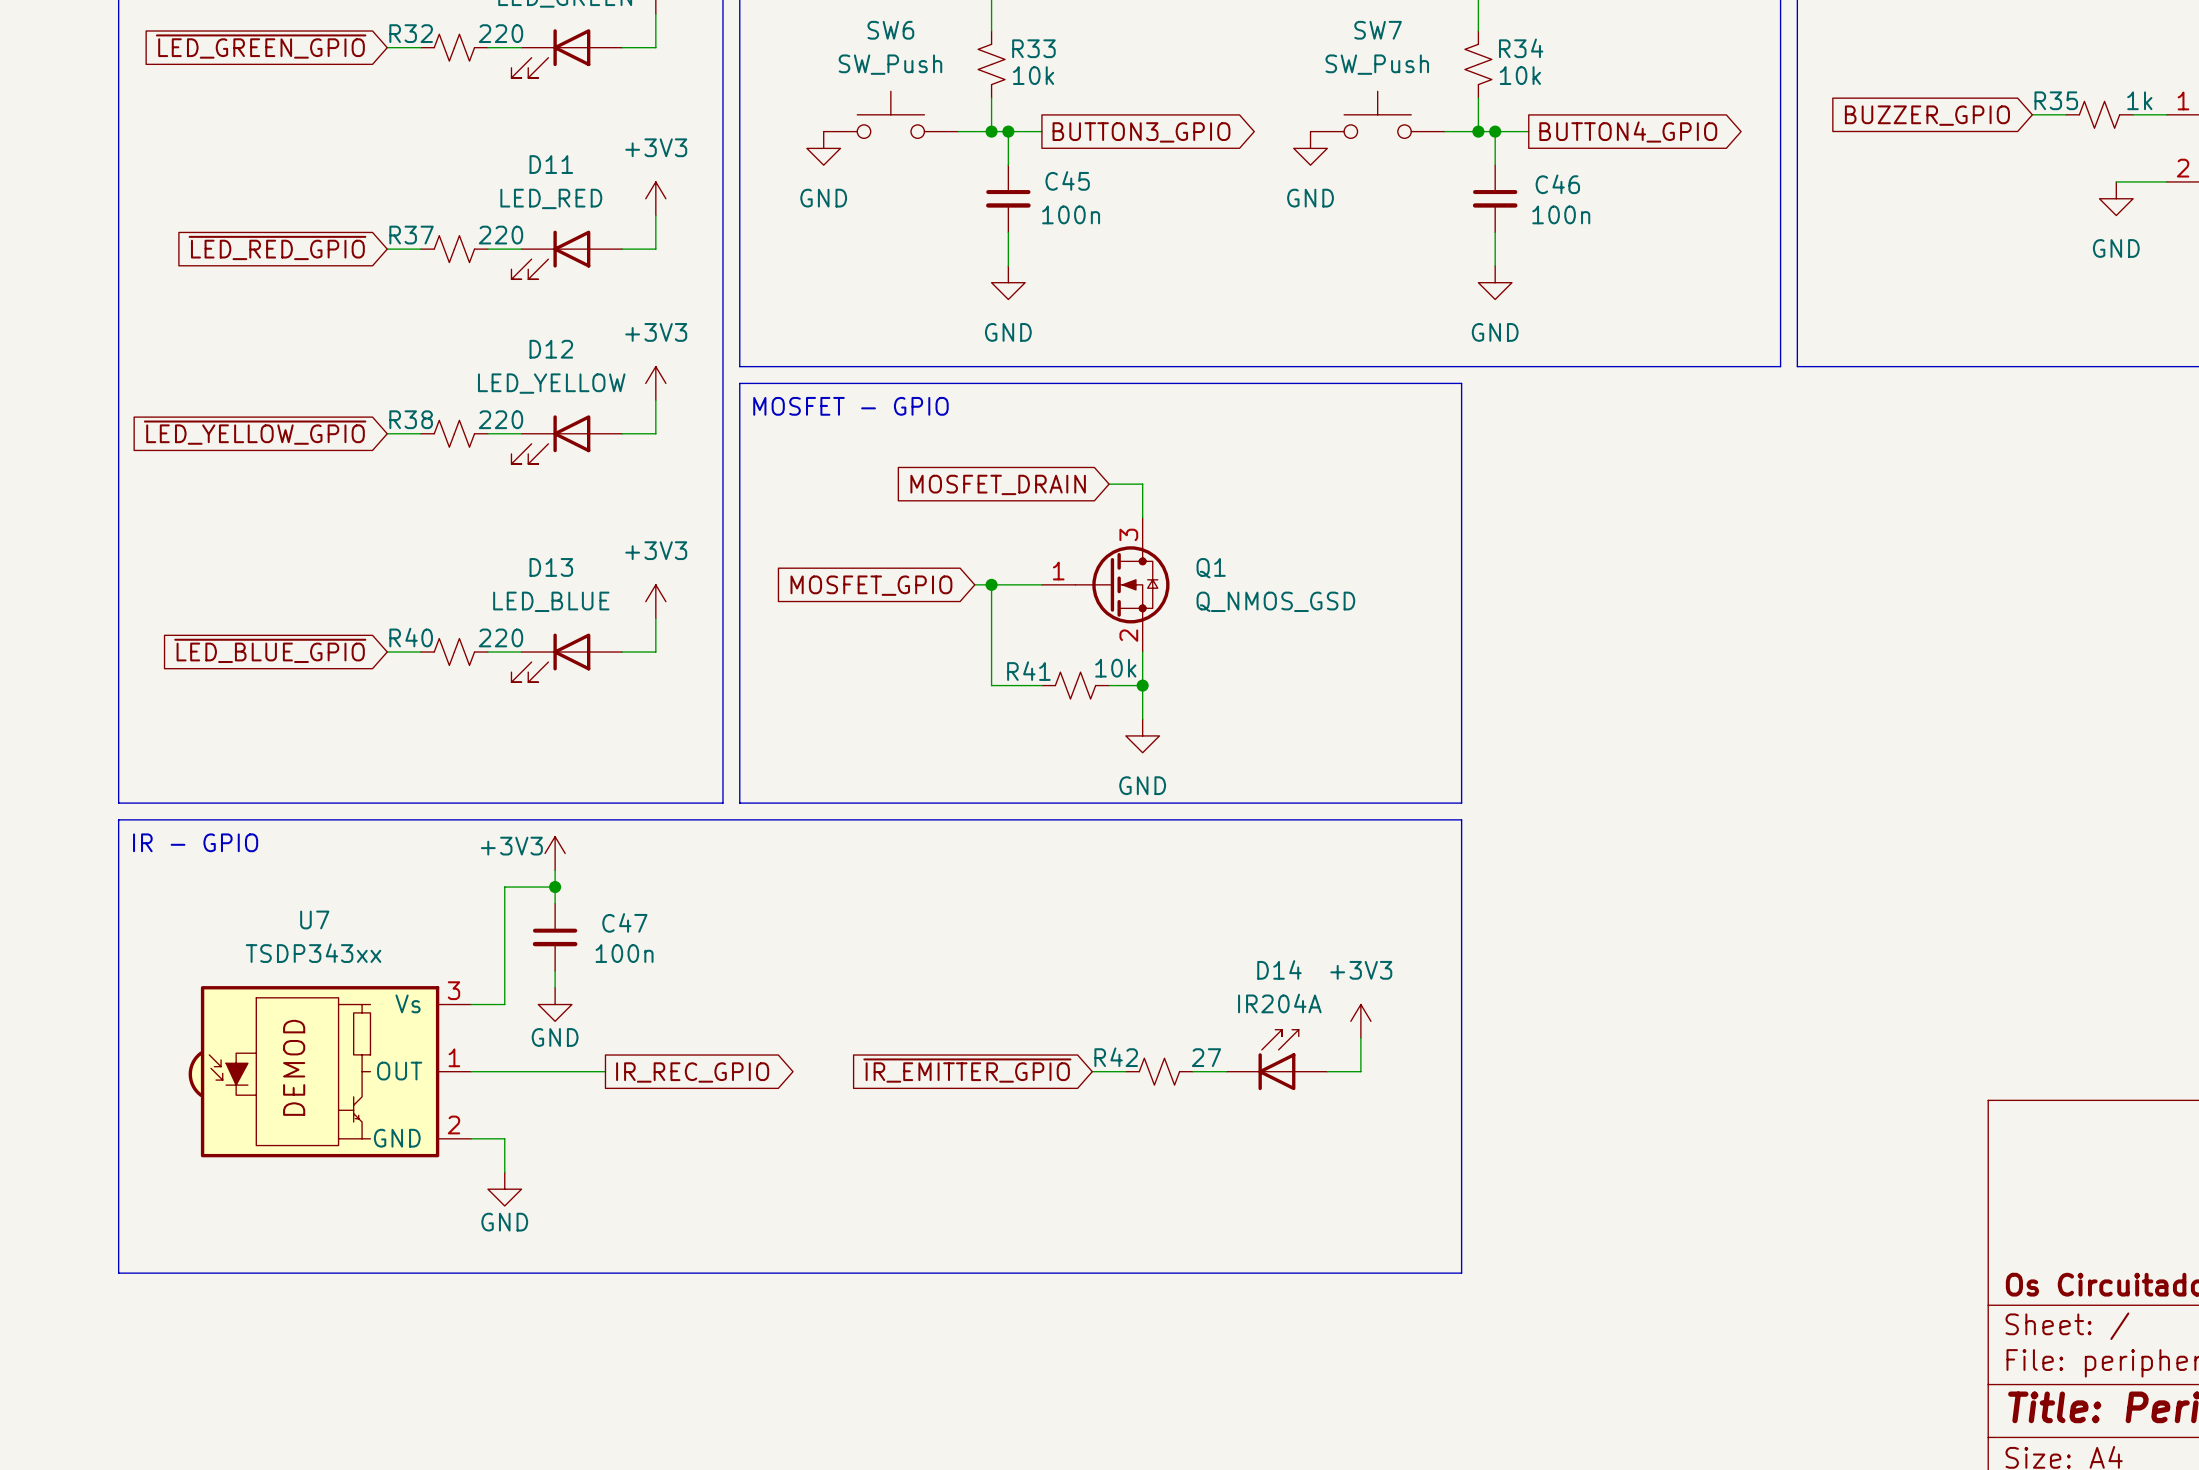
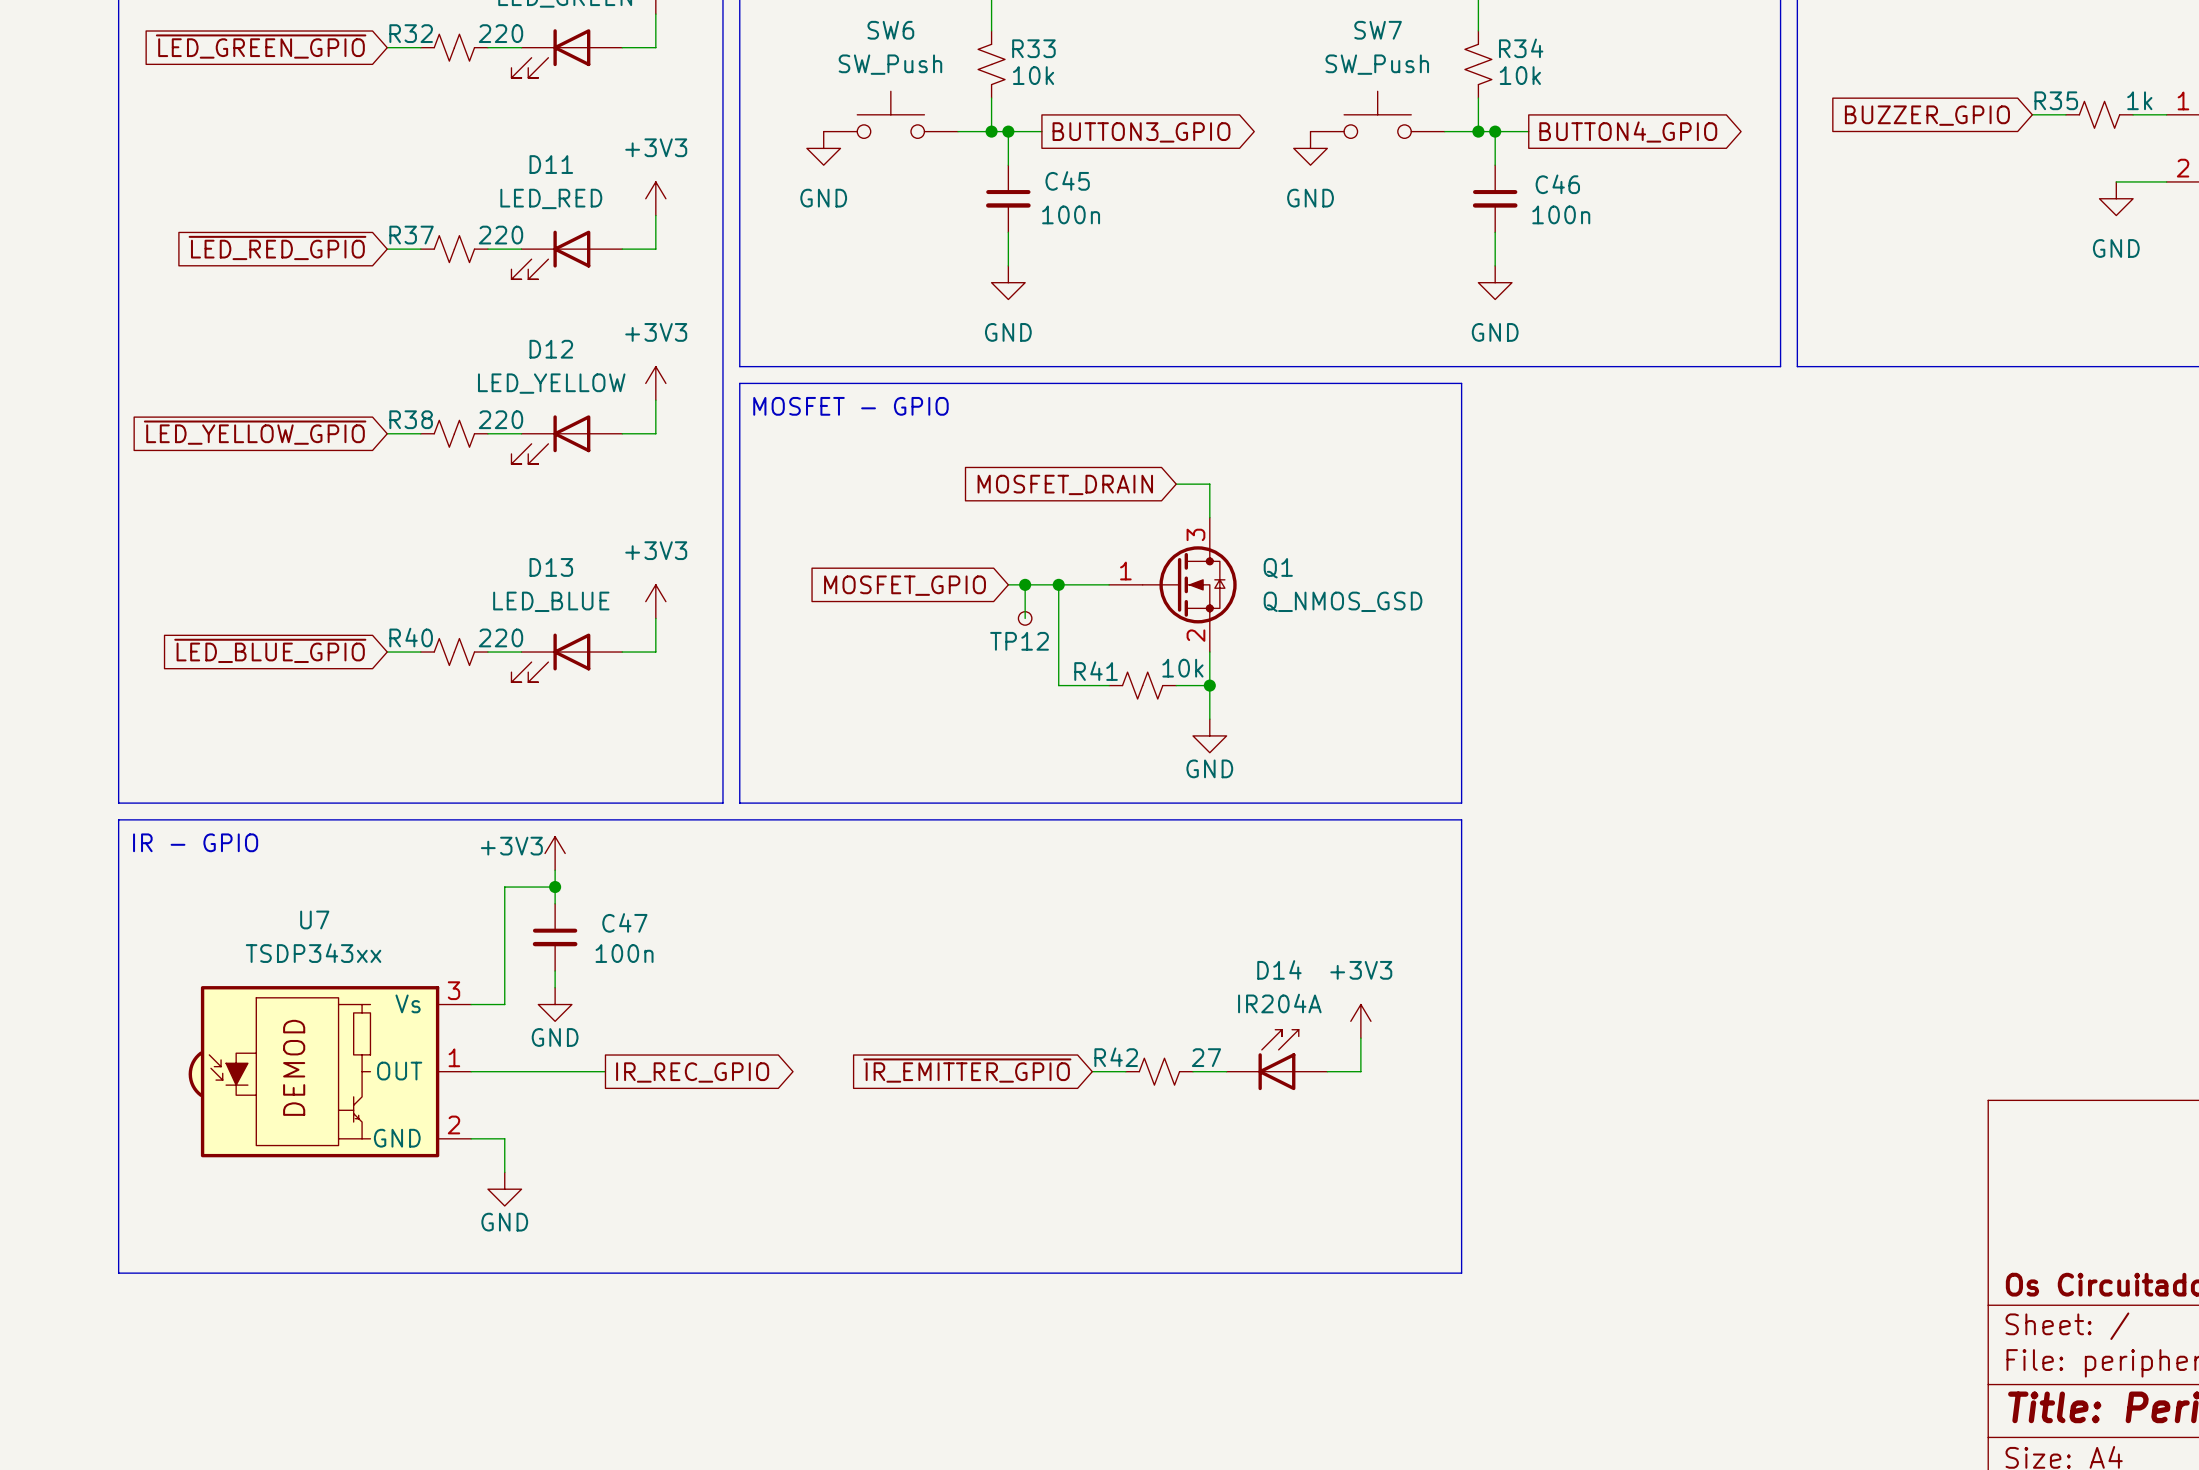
global label position: MOSFET_DRAIN (998, 484) -> MOSFET_DRAIN (1065, 484)
wire: (1109, 484) (1142, 484) (1142, 517) -> (1176, 484) (1209, 484) (1209, 517)
wire: (974, 584) (1008, 584) -> (1176, 685) (1209, 685)
wire: (991, 584) (991, 685) (1041, 685) -> none
junction: (991, 584) -> none
wire: none -> (1025, 584) (1025, 618)
junction: none -> (1025, 584)
junction: none -> (1058, 584)
Q1 position: (1105, 584) -> (1172, 584)
global label position: MOSFET_GPIO (871, 585) -> MOSFET_GPIO (905, 585)
TP12: none -> (1025, 618)
wire: (1142, 652) (1142, 719) -> (1209, 652) (1209, 719)
R41 position: (1075, 685) -> (1142, 685)
wire: (1109, 685) (1142, 685) -> (1109, 685) (1058, 685) (1058, 584)
junction: (1142, 685) -> none
junction: none -> (1209, 685)
power symbol position: GND (1142, 735) -> GND (1209, 735)
power symbol text position: GND (1142, 785) -> GND (1209, 768)

